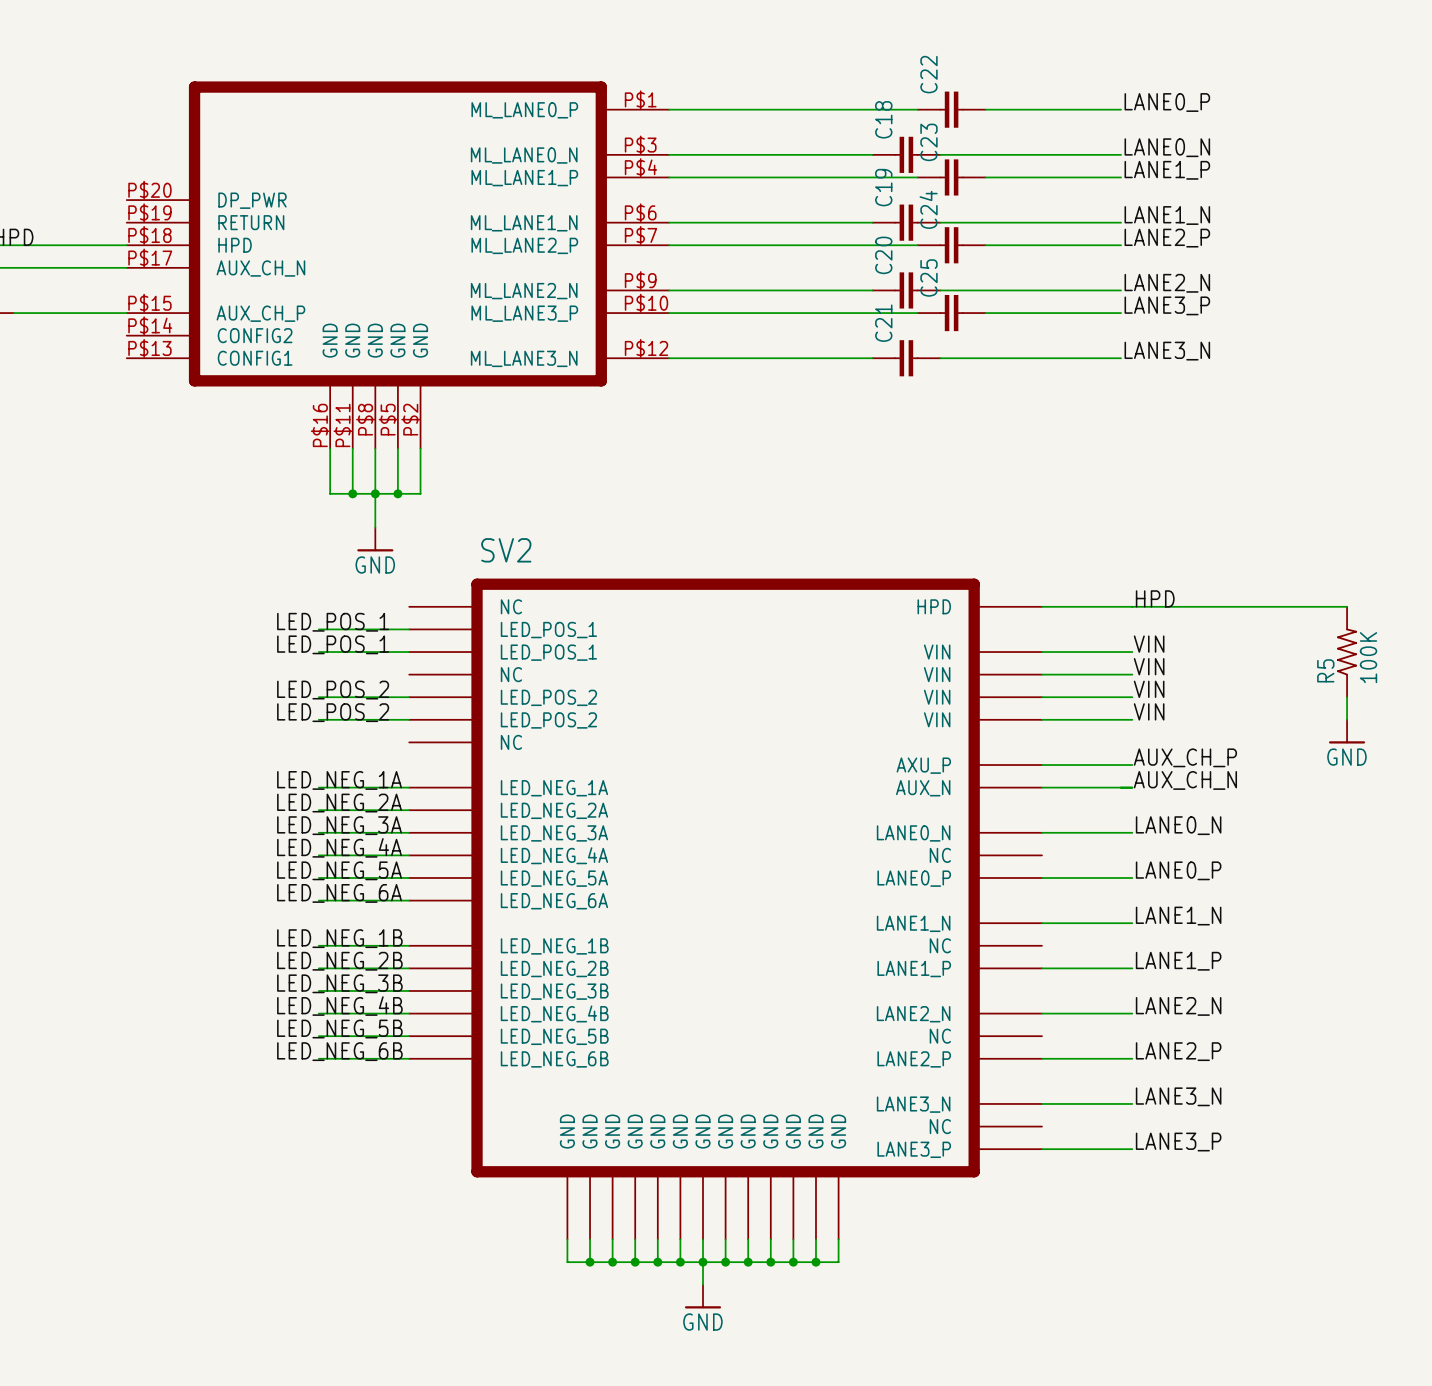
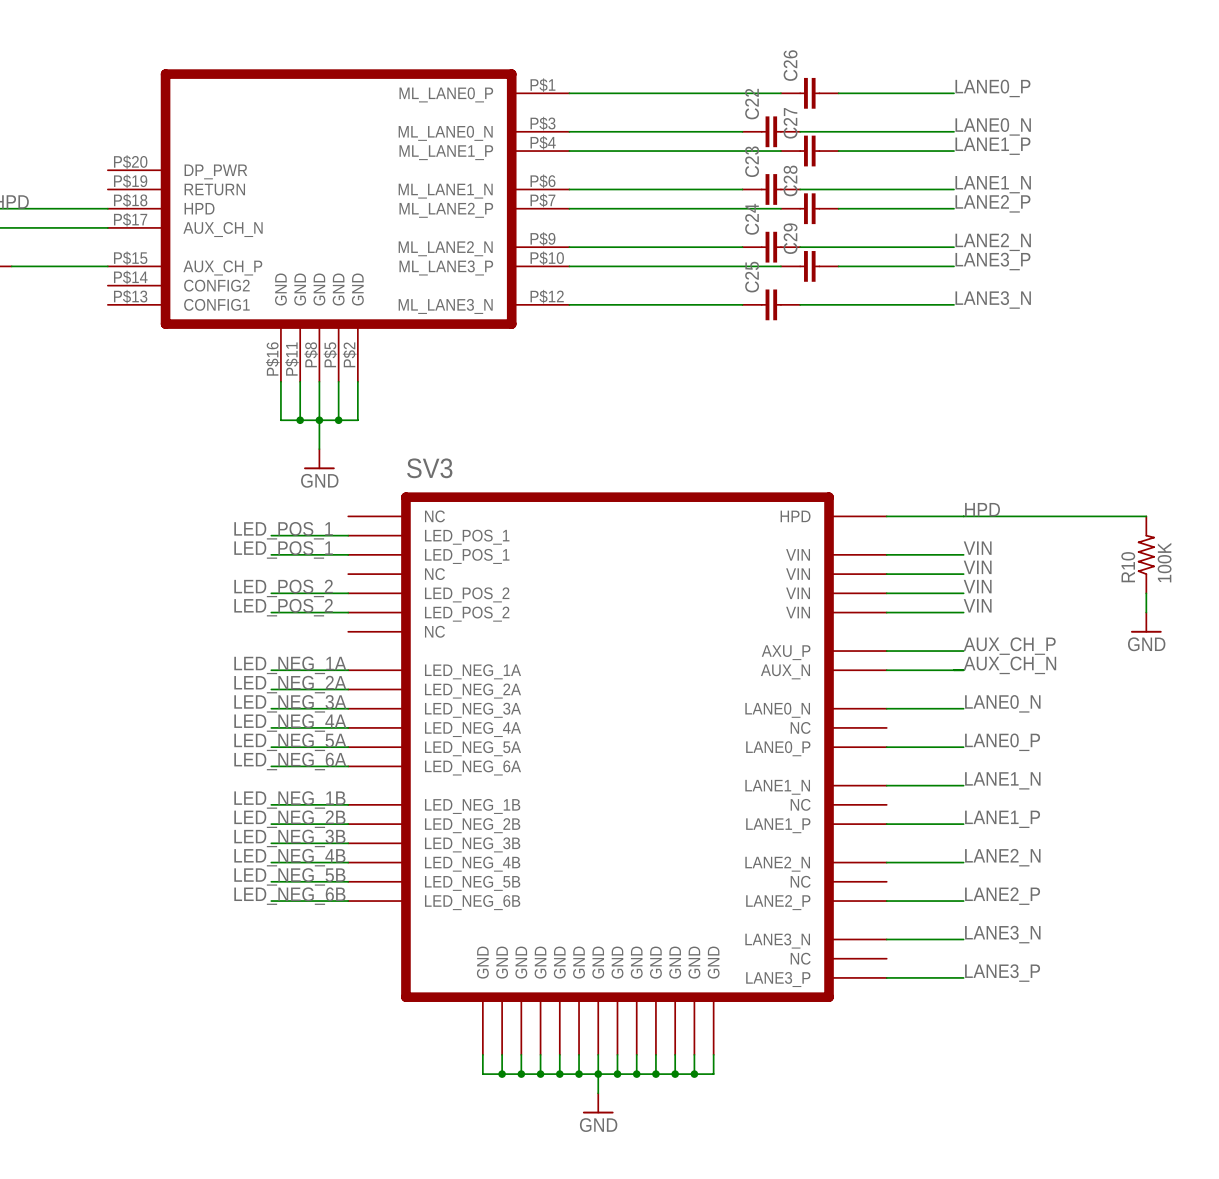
C22 name: C22 (928, 74) -> C26 (790, 65)
C18 name: C18 (883, 119) -> C22 (752, 104)
C23 name: C23 (928, 142) -> C27 (790, 123)
C19 name: C19 (883, 187) -> C23 (752, 161)
C24 name: C24 (928, 209) -> C28 (790, 180)
C20 name: C20 (883, 255) -> C24 (752, 219)
C25 name: C25 (928, 277) -> C29 (790, 238)
C21 name: C21 (883, 323) -> C25 (752, 277)
SV2 name: SV2 (506, 550) -> SV3 (429, 468)
R5 name: R5 (1325, 670) -> R10 (1128, 567)

